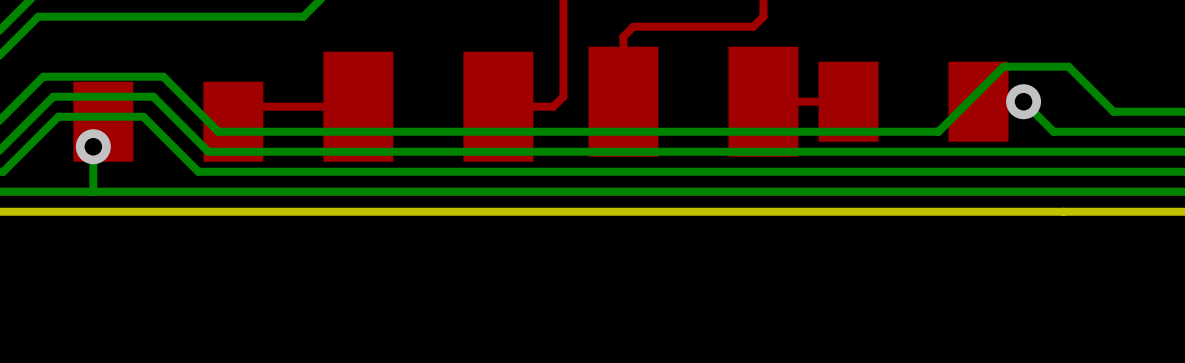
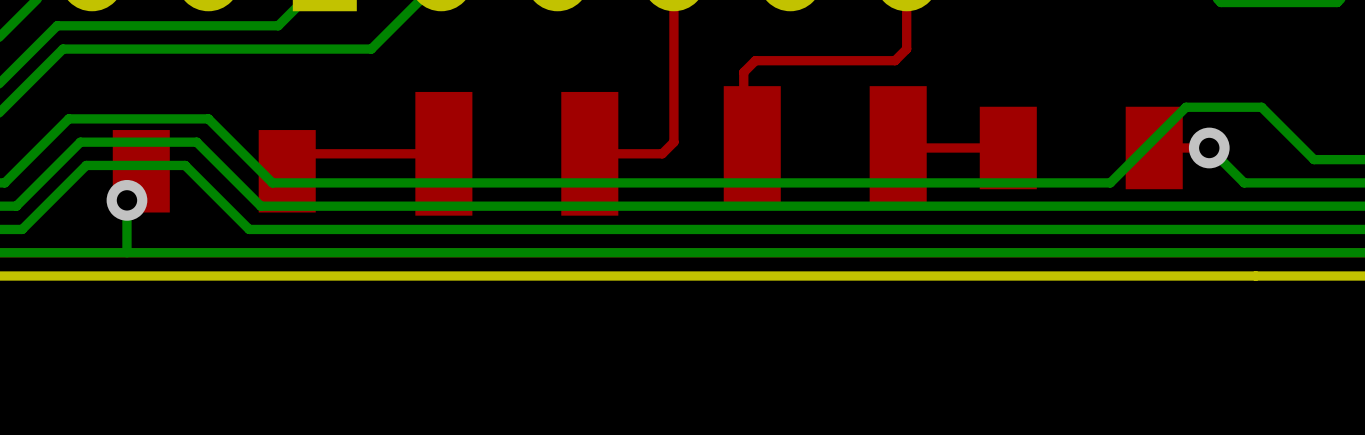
part footprint: [588, 46, 799, 157] -> [723, 86, 927, 210]
part footprint: [323, 51, 534, 162] -> [415, 91, 619, 216]
part footprint: [818, 61, 1009, 142] -> [979, 106, 1183, 190]
part footprint: [73, 81, 264, 162] -> [112, 130, 316, 213]

